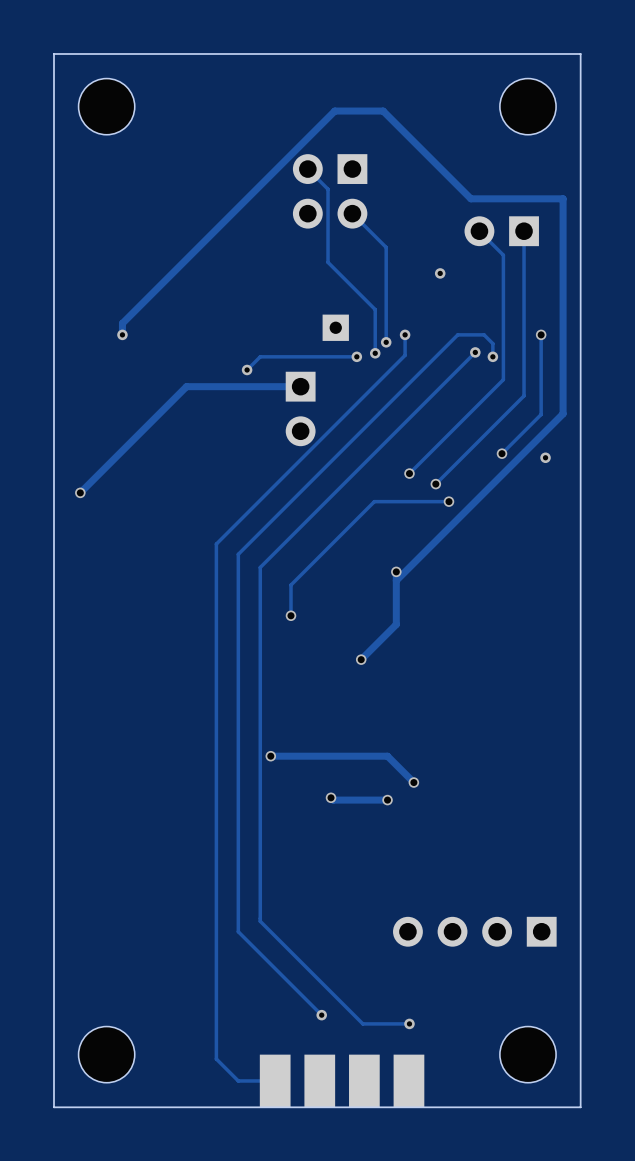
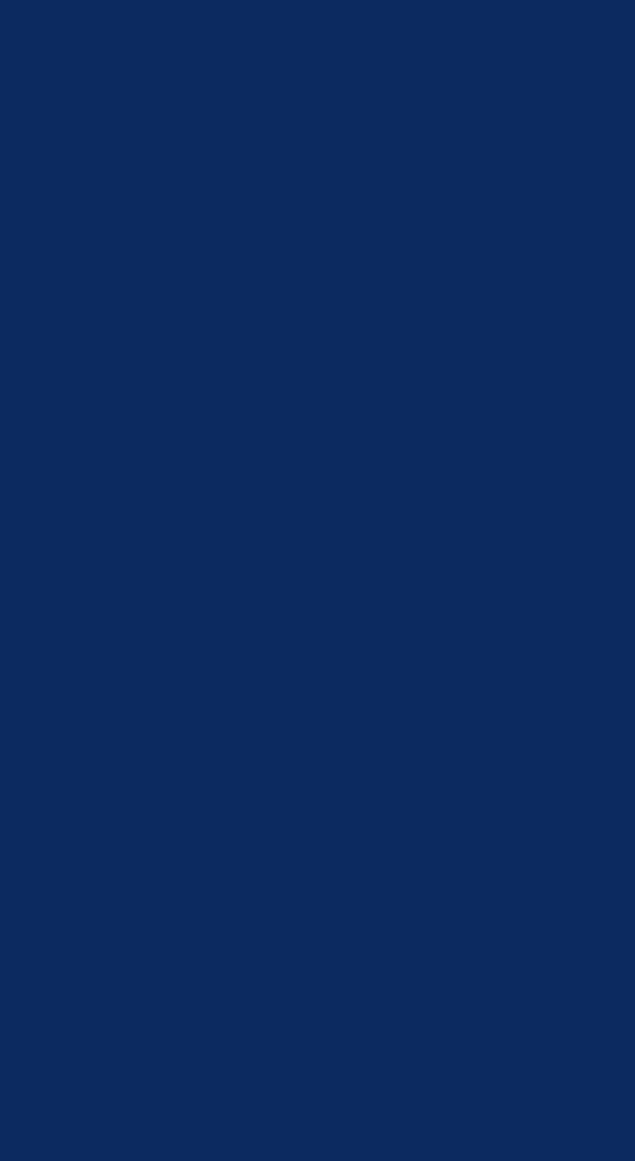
board edge: (580, 53) (580, 1107) (53, 1107) (53, 53) (580, 53) -> none
part: (106, 106) -> none
part: (527, 106) -> none
track: (307, 169) (328, 189) (328, 262) (375, 309) (375, 353) -> none
part: (330, 191) -> none
track: (352, 213) (386, 247) (386, 342) -> none
track: (479, 231) (503, 255) (503, 379) (409, 473) -> none
part: (501, 231) -> none
track: (524, 231) (524, 395) (435, 484) -> none
via: (440, 273) -> none
part: (335, 327) -> none
track: (122, 334) (122, 323) (334, 111) (383, 111) (470, 198) (563, 198) (563, 413) (396, 580) -> none
via: (122, 334) -> none
track: (405, 334) (405, 355) (216, 544) (216, 1059) (238, 1080) (275, 1080) -> none
via: (405, 334) -> none
track: (541, 334) (541, 414) (502, 453) -> none
via: (541, 334) -> none
via: (386, 342) -> none
track: (475, 352) (260, 567) (260, 921) (362, 1023) (409, 1023) -> none
via: (475, 352) -> none
via: (375, 353) -> none
track: (356, 356) (260, 356) (247, 369) -> none
via: (356, 356) -> none
track: (492, 356) (492, 343) (484, 334) (457, 334) (238, 554) (238, 931) (321, 1015) -> none
via: (492, 356) -> none
via: (247, 369) -> none
track: (300, 386) (186, 386) (80, 492) -> none
part: (300, 408) -> none
via: (502, 453) -> none
via: (545, 457) -> none
via: (409, 473) -> none
via: (435, 484) -> none
via: (80, 492) -> none
track: (448, 501) (374, 501) (290, 585) (290, 615) -> none
via: (448, 501) -> none
track: (396, 571) (396, 624) (361, 659) -> none
via: (396, 571) -> none
via: (290, 615) -> none
via: (361, 659) -> none
track: (270, 756) (387, 756) (413, 782) -> none
via: (270, 756) -> none
via: (413, 782) -> none
track: (331, 797) (333, 800) (387, 800) -> none
via: (331, 797) -> none
via: (387, 800) -> none
part: (474, 931) -> none
via: (321, 1015) -> none
via: (409, 1023) -> none
part: (106, 1054) -> none
part: (527, 1054) -> none
part: (342, 1080) -> none

